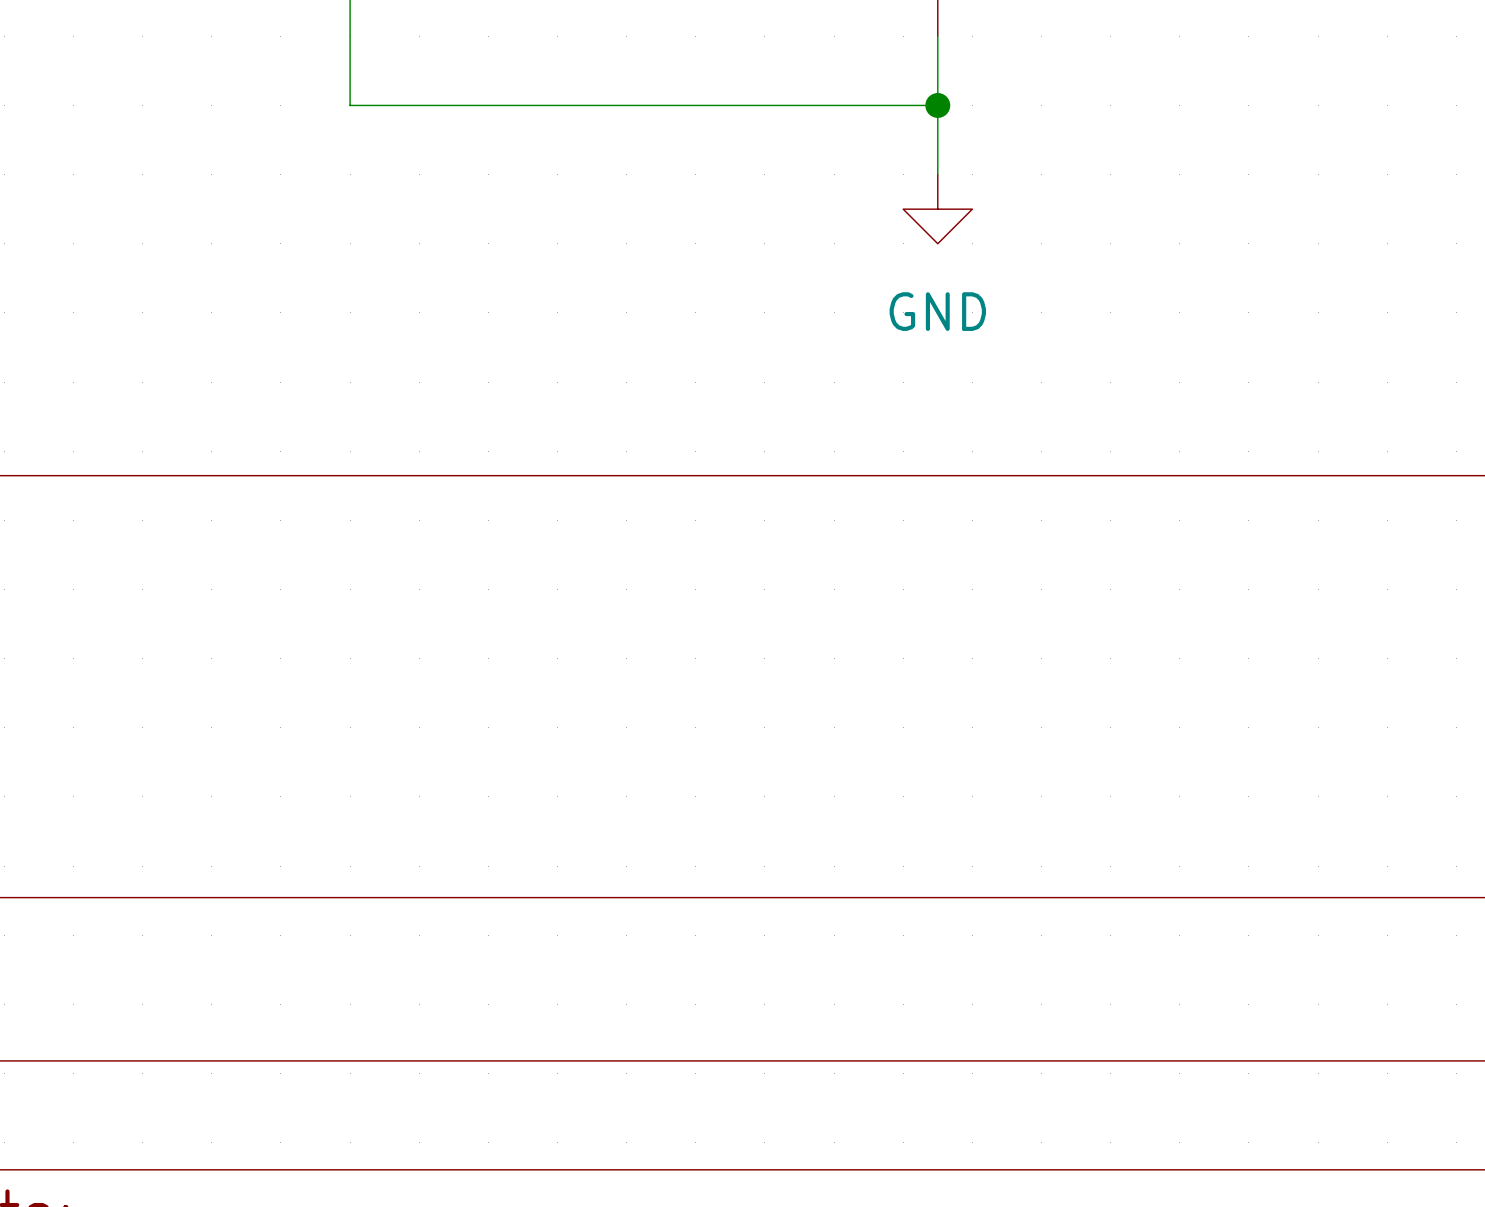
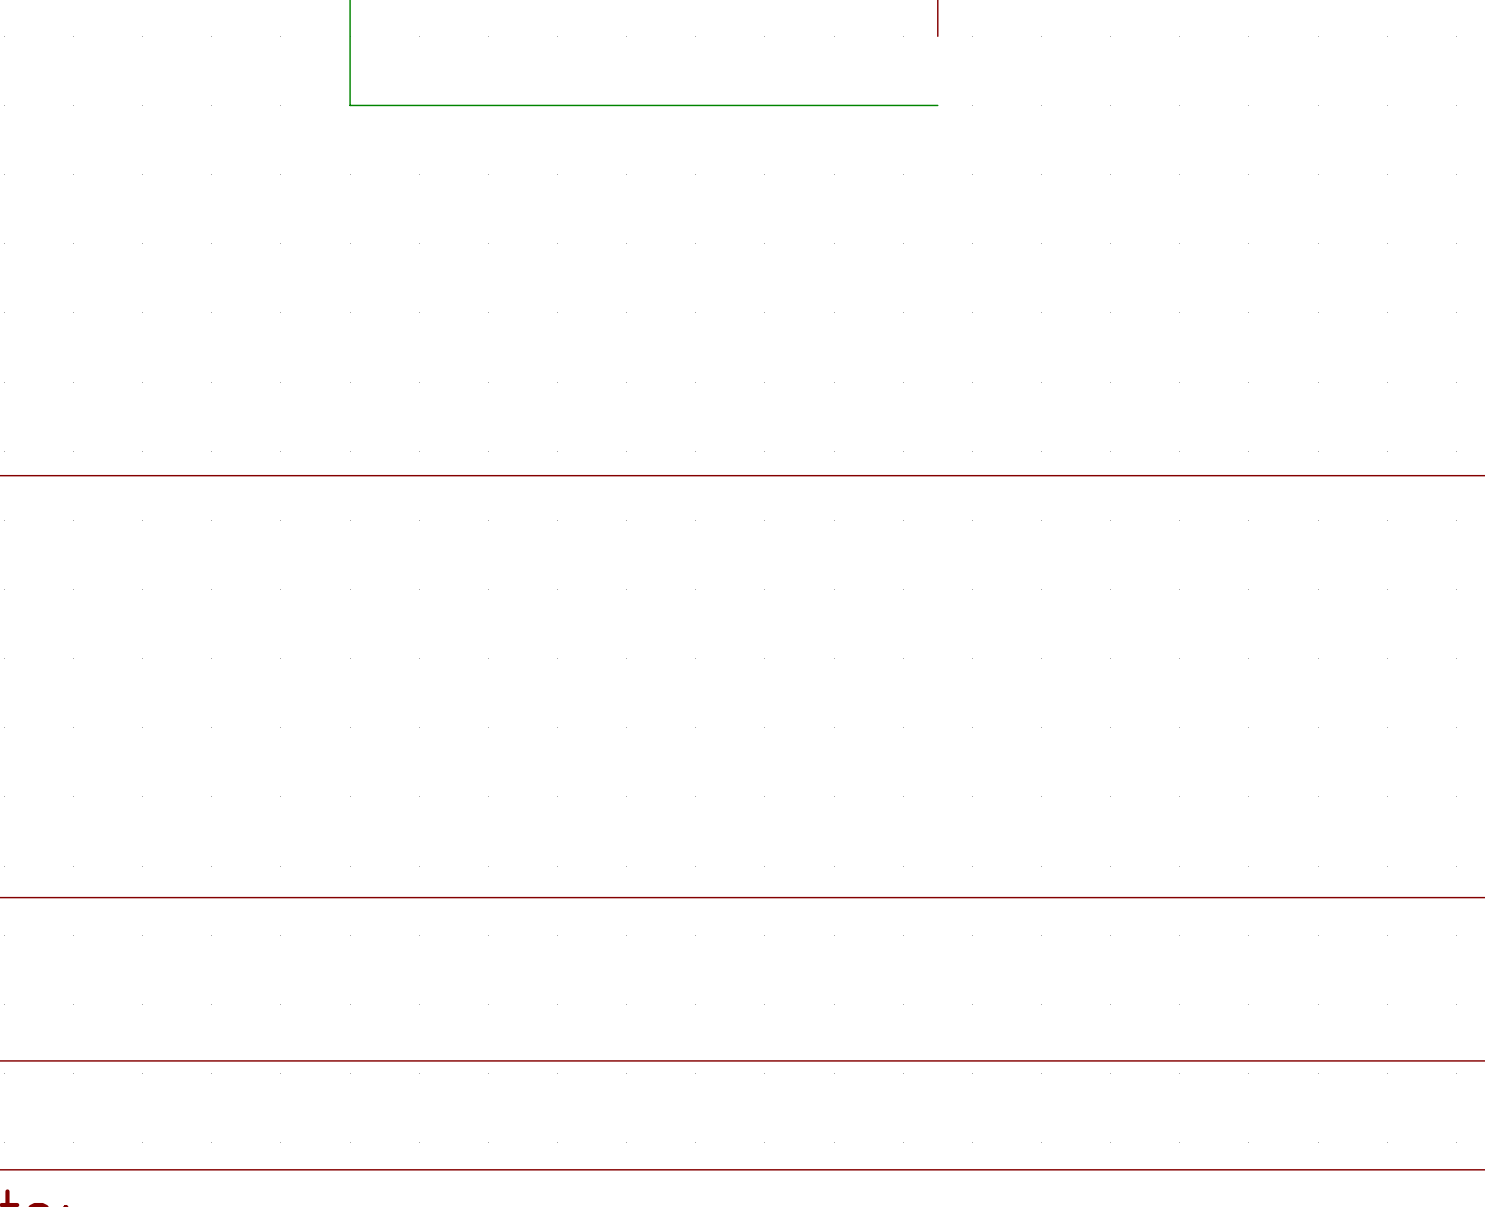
wire: (937, 36) (937, 174) -> none
junction: (937, 105) -> none
power symbol: GND (937, 209) -> none

